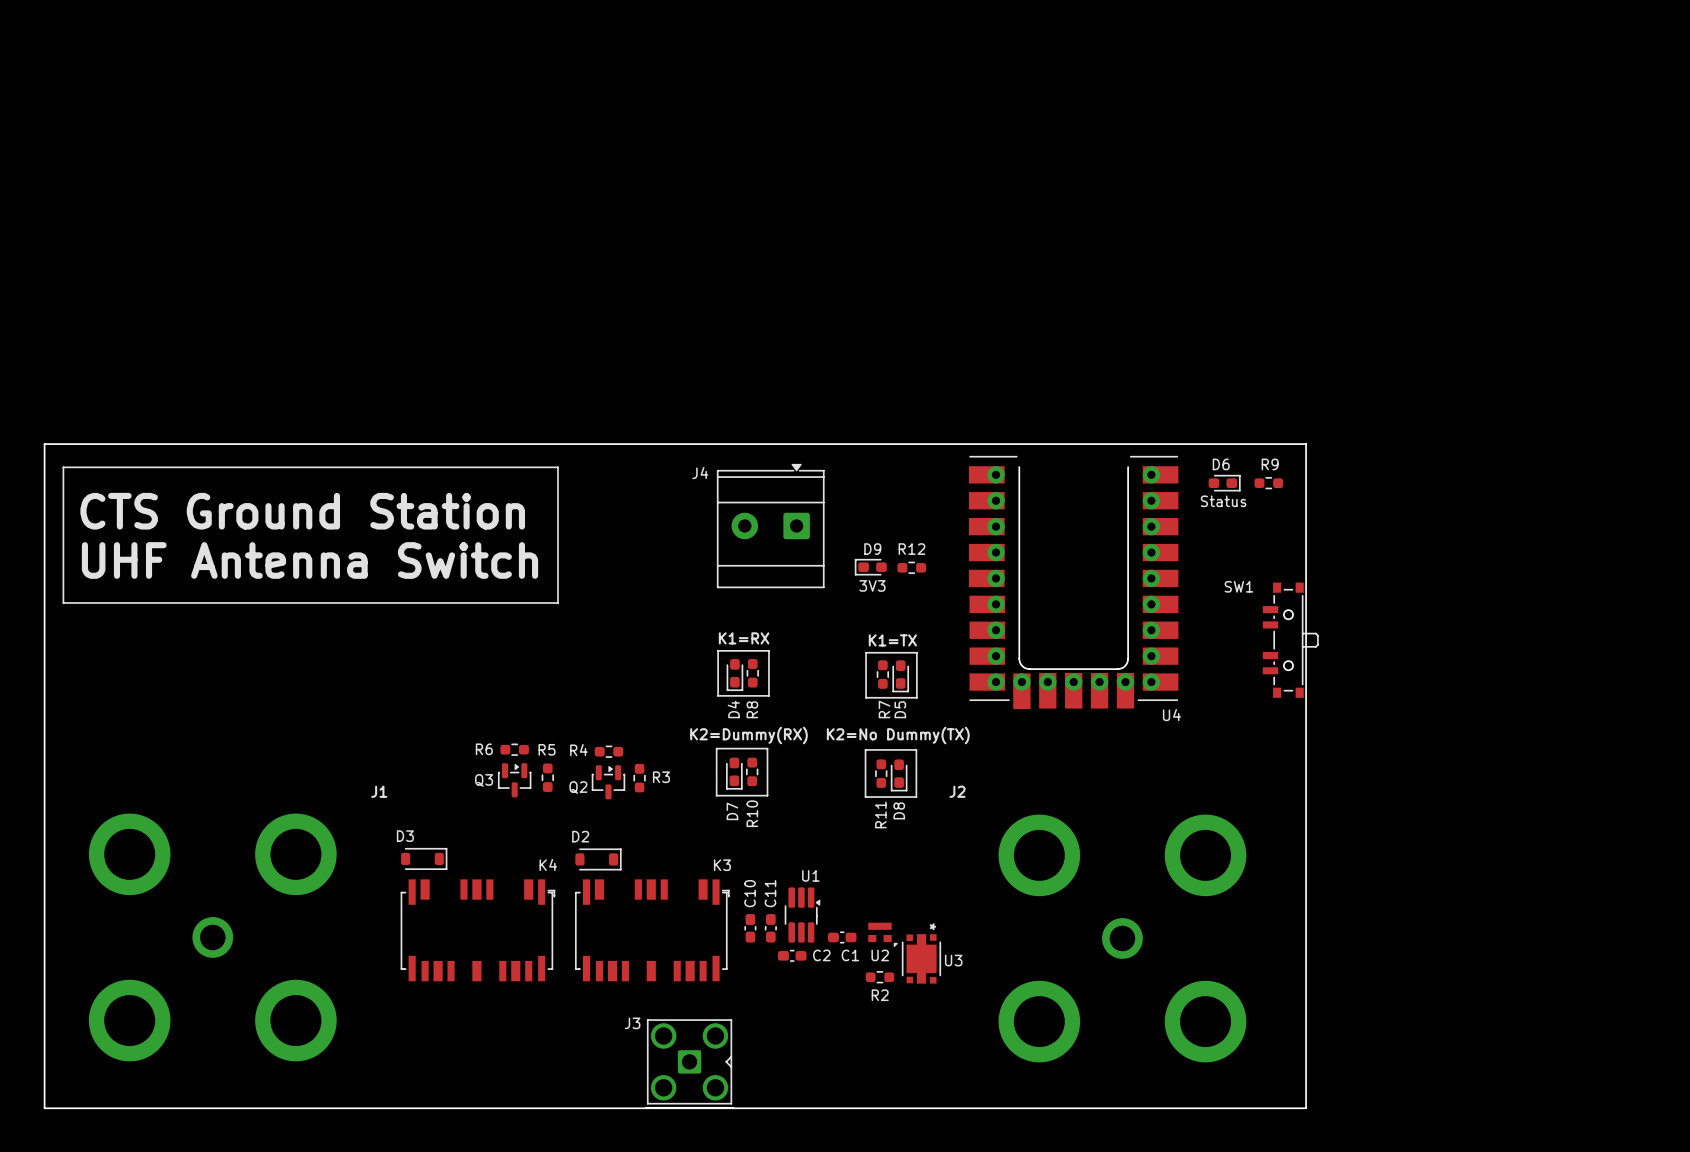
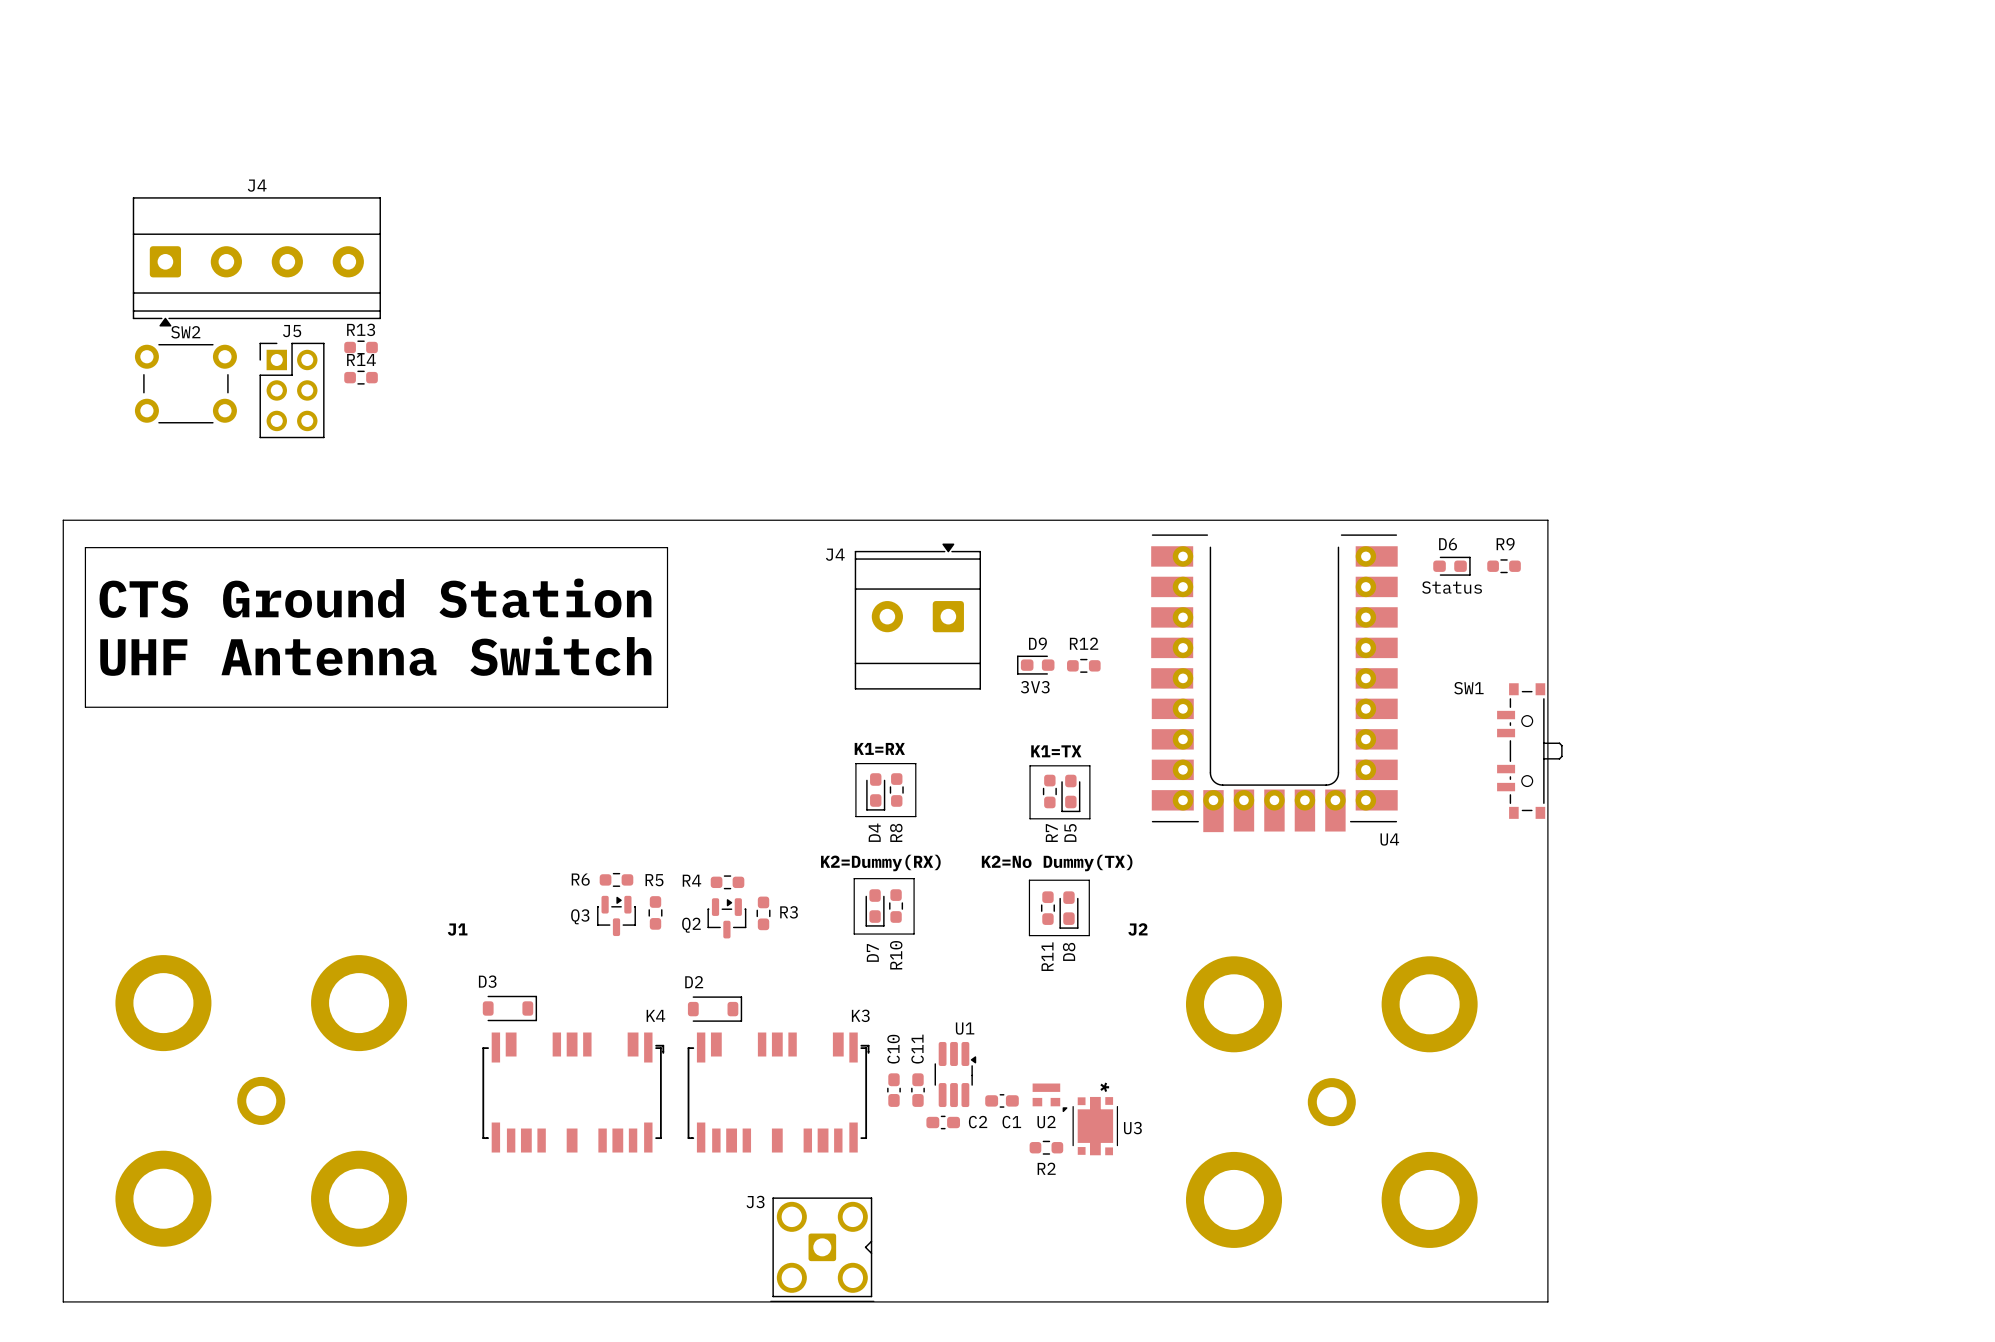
J4: none -> (256, 261)
R13: none -> (361, 347)
R14: none -> (361, 377)
SW2: none -> (185, 383)
J5: none -> (292, 390)

